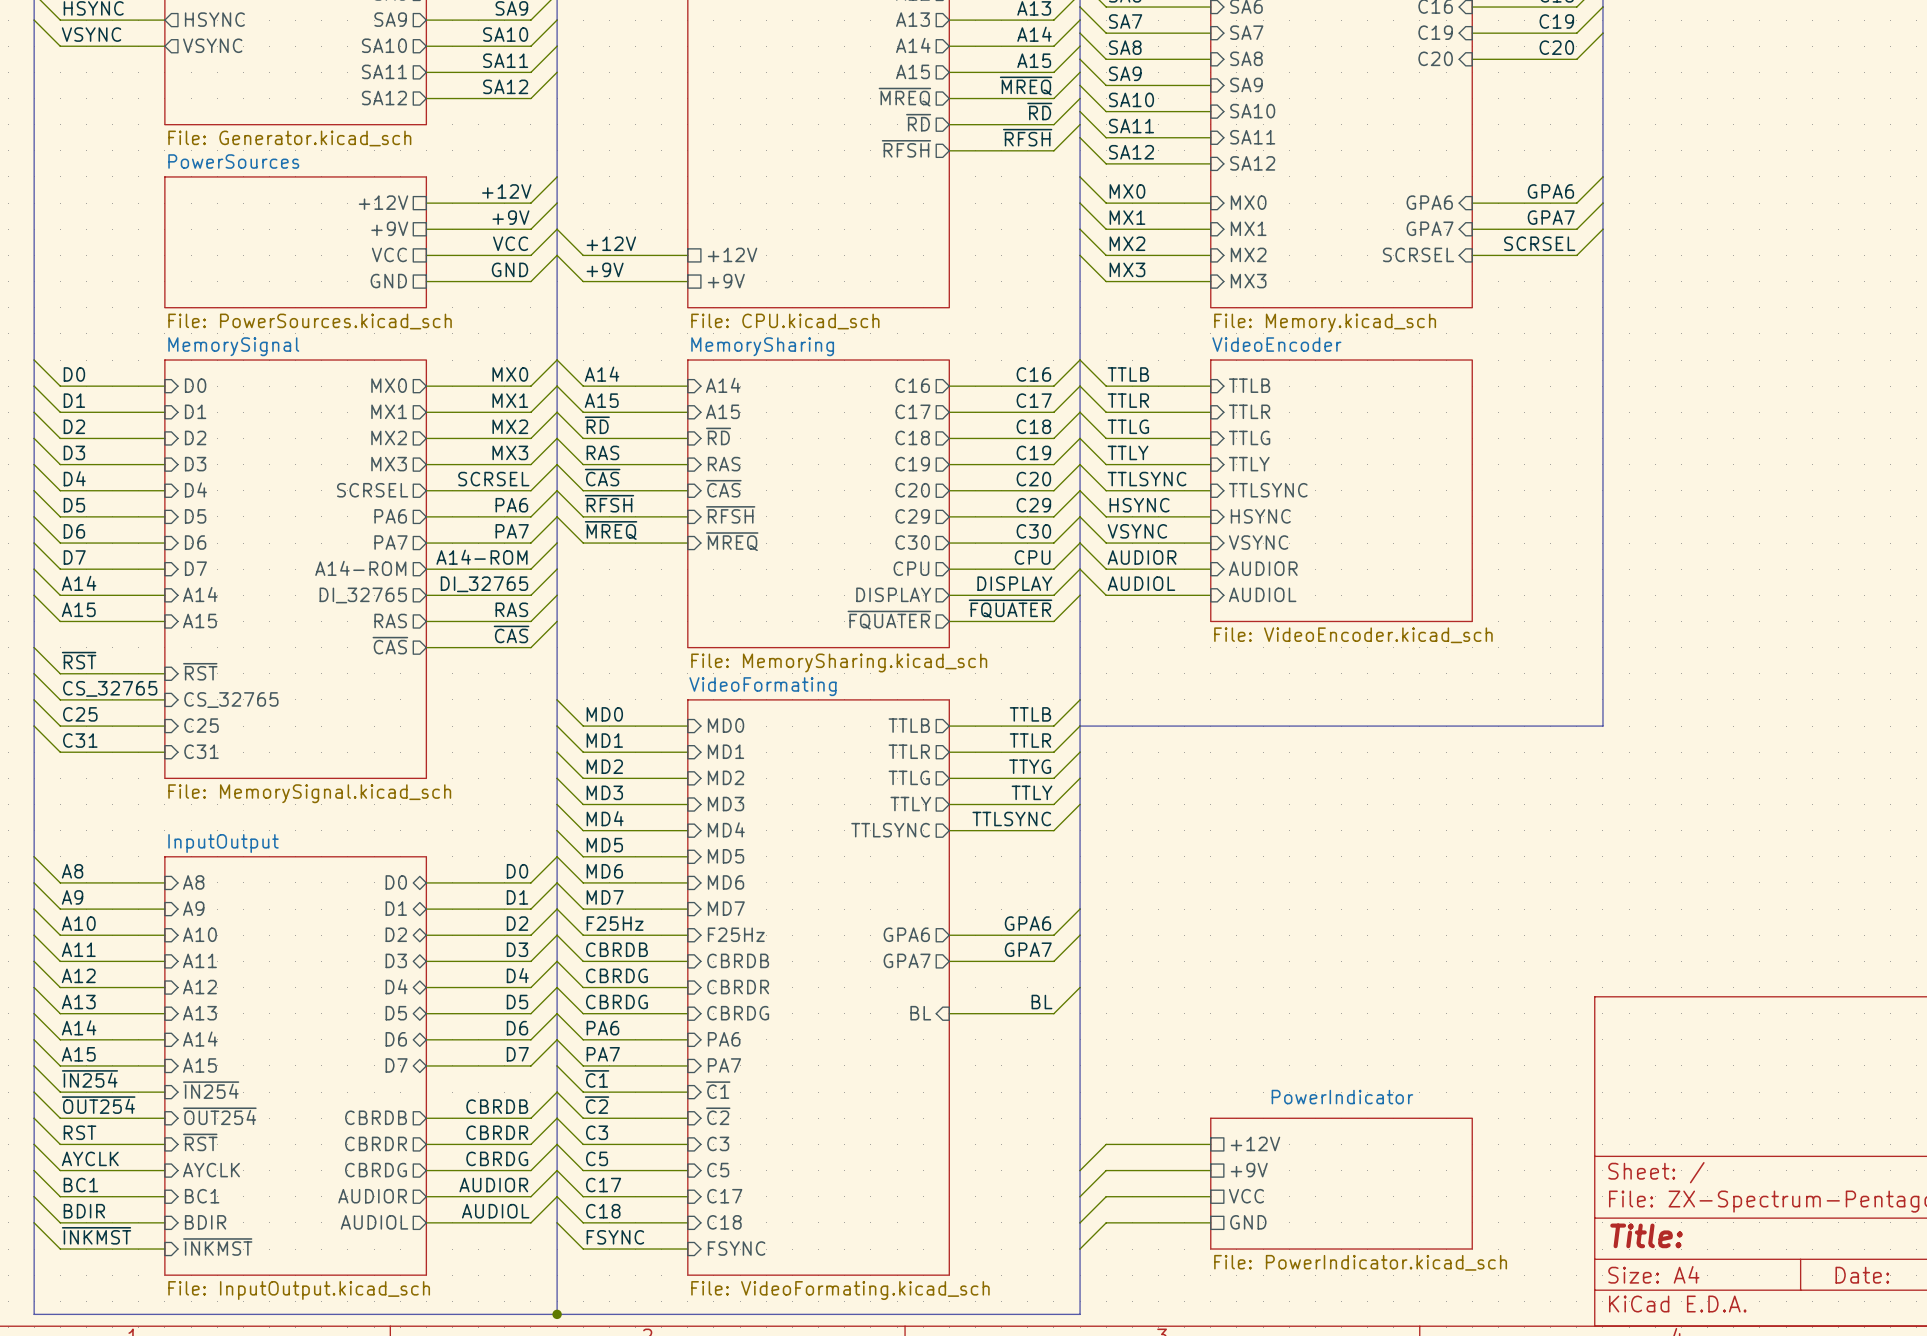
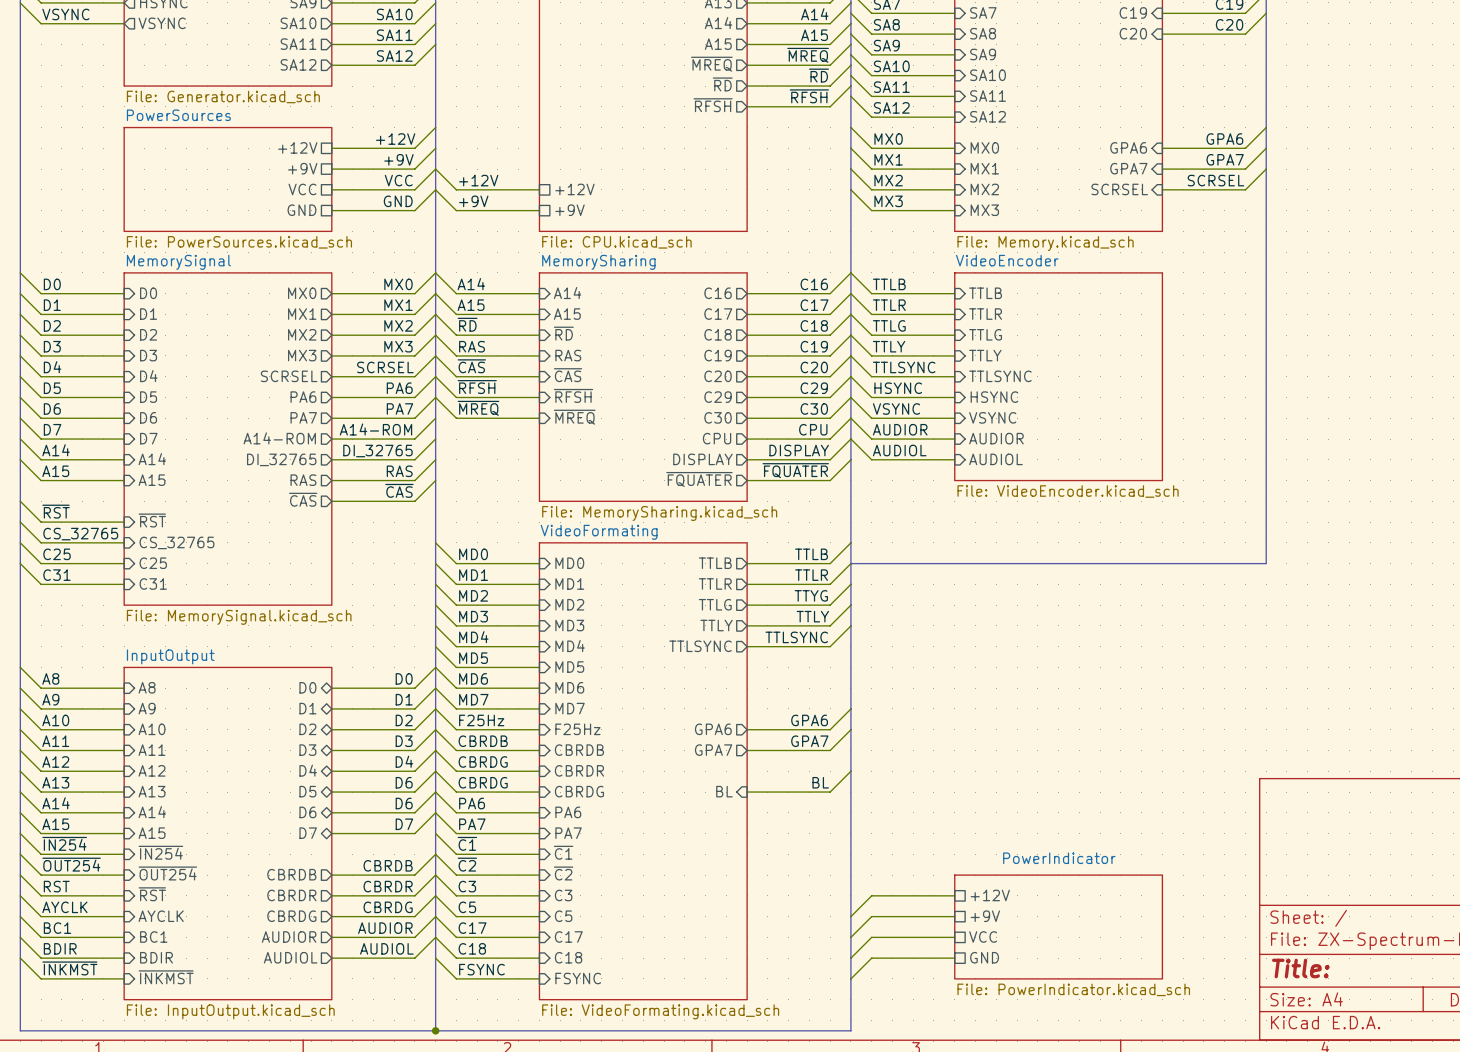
label: D5 (517, 1002) -> D6 (404, 782)

